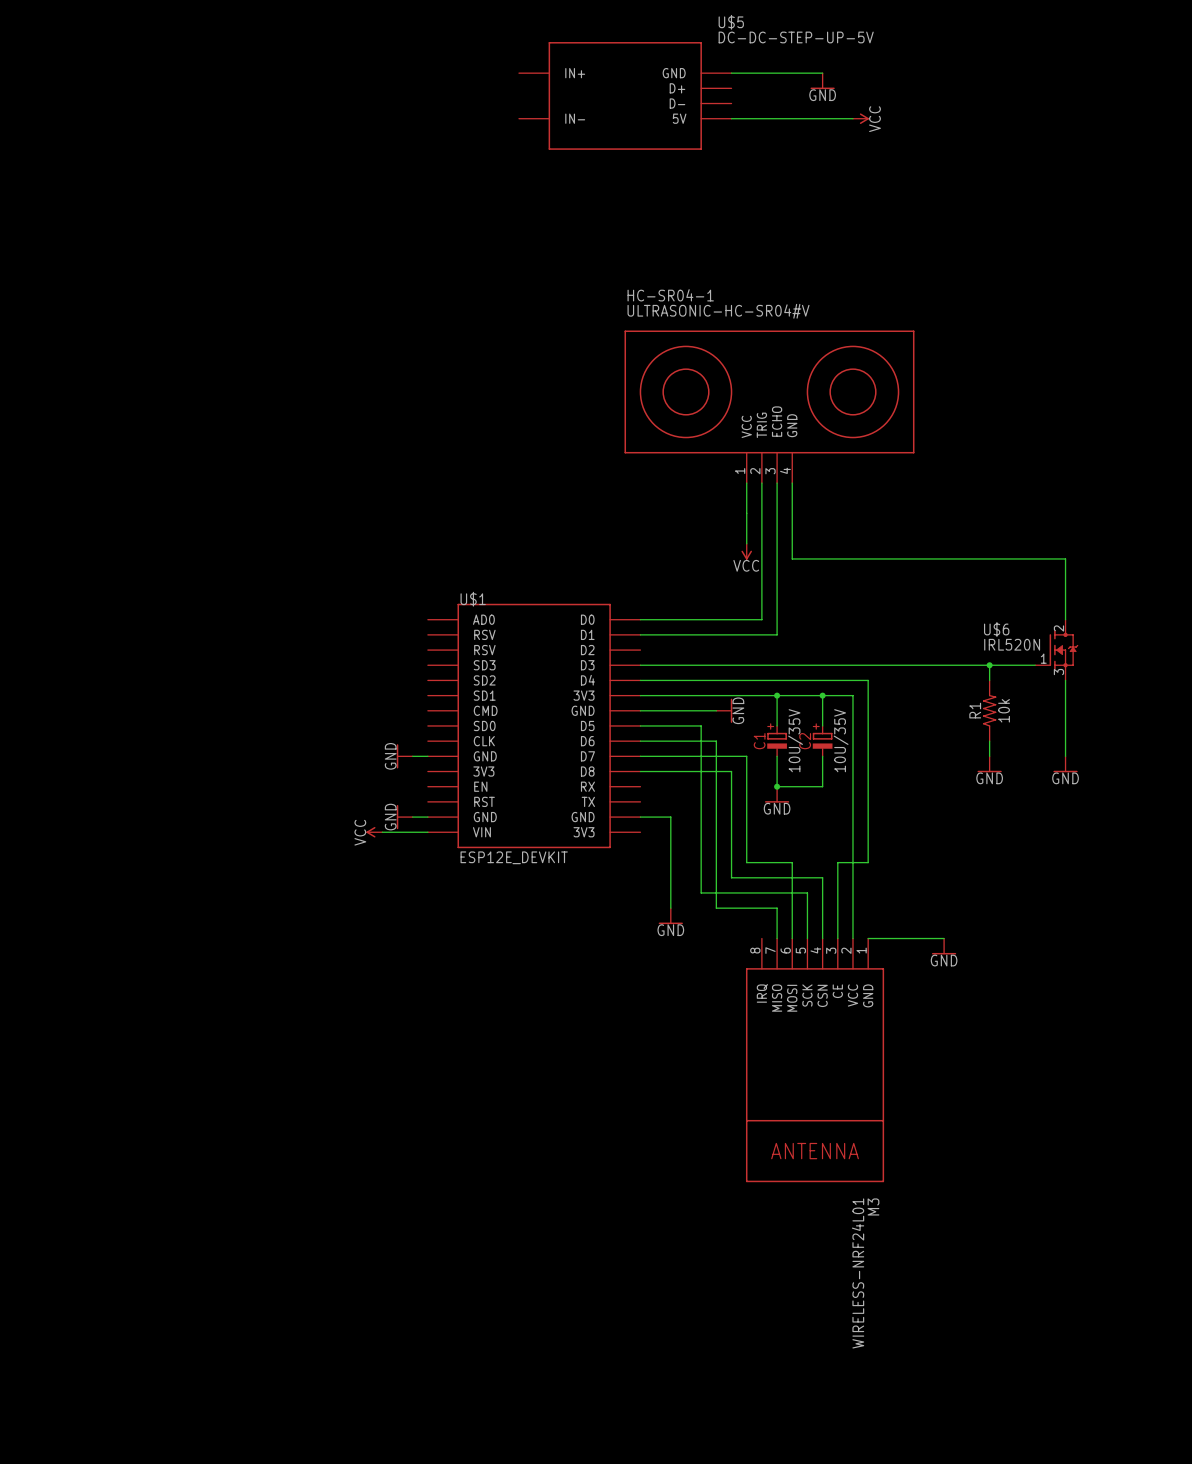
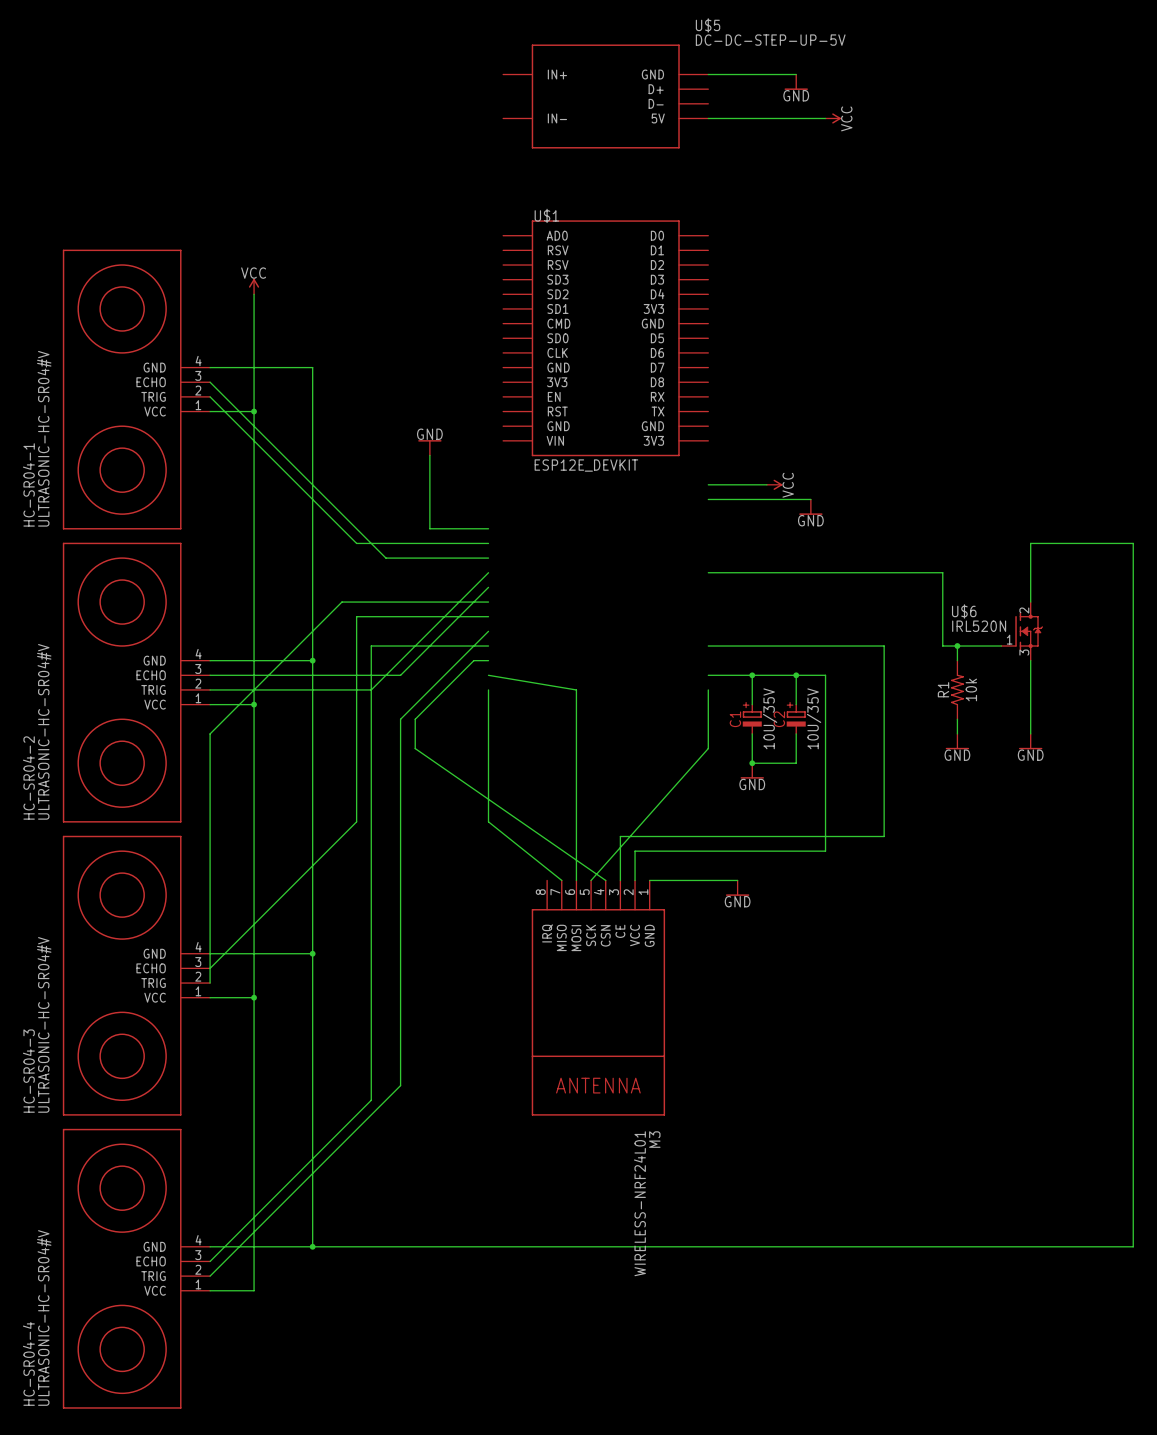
power symbol: none -> VCC (254, 286)
wire: none -> (254, 294) (254, 1290) (210, 1290)
wire: none -> (210, 367) (312, 367) (312, 1246)
wire: none -> (210, 382) (385, 558) (488, 558)
HC-SR04-1 rotation: 0° (769, 391) -> 90° counterclockwise (122, 389)
HC-SR04-1 position: (769, 406) -> (136, 389)
wire: none -> (210, 396) (356, 543) (488, 543)
wire: none -> (210, 411) (254, 411)
junction: none -> (254, 411)
power symbol: none -> GND (429, 447)
wire: none -> (429, 455) (429, 528) (488, 528)
wire: (746, 483) (746, 543) -> none
wire: (761, 483) (761, 619) (640, 619) -> none
wire: (777, 483) (777, 634) (640, 634) -> none
wire: (792, 483) (792, 558) (1065, 558) -> (210, 1246) (1133, 1246) (1133, 543) (1030, 543)
wire: none -> (708, 484) (766, 484)
wire: none -> (708, 499) (810, 499)
power symbol: none -> GND (810, 507)
power symbol position: VCC (746, 551) -> VCC (774, 484)
power symbol rotation: 0° (746, 555) -> 90° counterclockwise (777, 484)
wire: none -> (488, 572) (371, 689) (210, 689)
wire: none -> (488, 587) (400, 675) (210, 675)
wire: none -> (488, 602) (341, 602) (210, 733) (210, 983)
wire: none -> (488, 616) (356, 616) (356, 821) (210, 968)
wire: none -> (488, 631) (400, 719) (400, 1085) (210, 1276)
wire: none -> (488, 646) (371, 646) (371, 1100) (210, 1261)
wire: (640, 665) (731, 665) -> none
wire: (913, 665) (974, 665) -> (708, 572) (942, 572) (942, 646)
wire: none -> (210, 660) (312, 660)
junction: none -> (312, 660)
wire: none -> (488, 660) (473, 660) (415, 719) (415, 748) (605, 880)
wire: (640, 680) (868, 680) (868, 862) -> (884, 646) (884, 836) (840, 836)
wire: none -> (488, 675) (576, 689) (576, 880)
wire: (640, 695) (731, 695) -> none
HC-SR04-2: none -> ULTRASONIC-HC-SR04#V (136, 682)
wire: none -> (488, 689) (488, 821) (561, 880)
wire: (640, 710) (716, 710) -> none
power symbol: GND (724, 710) -> none
wire: none -> (708, 689) (708, 748) (591, 880)
wire: none -> (210, 704) (254, 704)
junction: none -> (254, 704)
U$1 position: (534, 725) -> (605, 338)
wire: (640, 725) (701, 725) (701, 892) (807, 892) (807, 938) -> none
wire: (640, 741) (716, 741) (716, 908) -> none
power symbol: GND (404, 756) -> none
wire: (412, 756) (427, 756) -> none
wire: (640, 756) (746, 756) (746, 862) -> (620, 880) (620, 836) (722, 836)
wire: (640, 771) (731, 771) (731, 877) -> (635, 880) (635, 851) (708, 851)
power symbol: GND (404, 817) -> none
wire: (412, 817) (427, 817) -> none
wire: (640, 817) (670, 817) (670, 908) -> (693, 880) (649, 880)
power symbol: VCC (374, 832) -> none
wire: (382, 832) (427, 832) -> none
wire: (792, 862) (792, 938) -> (766, 836) (810, 836)
wire: (837, 862) (837, 938) -> none
wire: (822, 877) (822, 938) -> (796, 851) (825, 851)
wire: (852, 877) (852, 938) -> none
wire: (761, 908) (777, 908) (777, 938) -> none
power symbol position: GND (670, 916) -> GND (737, 888)
wire: (868, 938) (944, 938) -> none
power symbol: GND (944, 946) -> none
wire: none -> (210, 953) (312, 953)
junction: none -> (312, 953)
HC-SR04-3: none -> ULTRASONIC-HC-SR04#V (136, 975)
wire: none -> (210, 997) (254, 997)
junction: none -> (254, 997)
M3 position: (815, 1060) -> (598, 998)
junction: none -> (312, 1246)
HC-SR04-4: none -> ULTRASONIC-HC-SR04#V (136, 1268)

